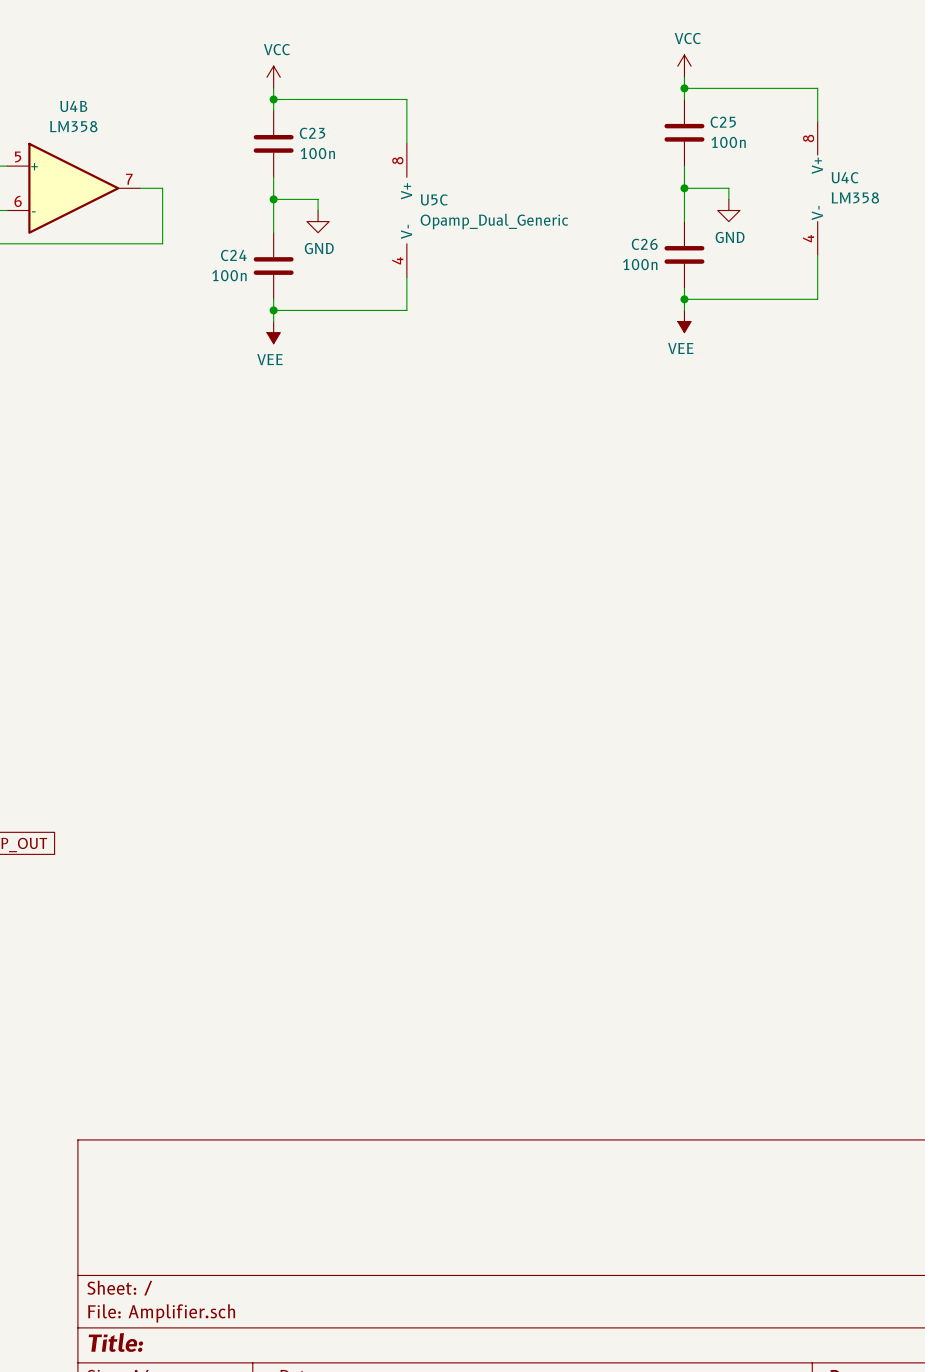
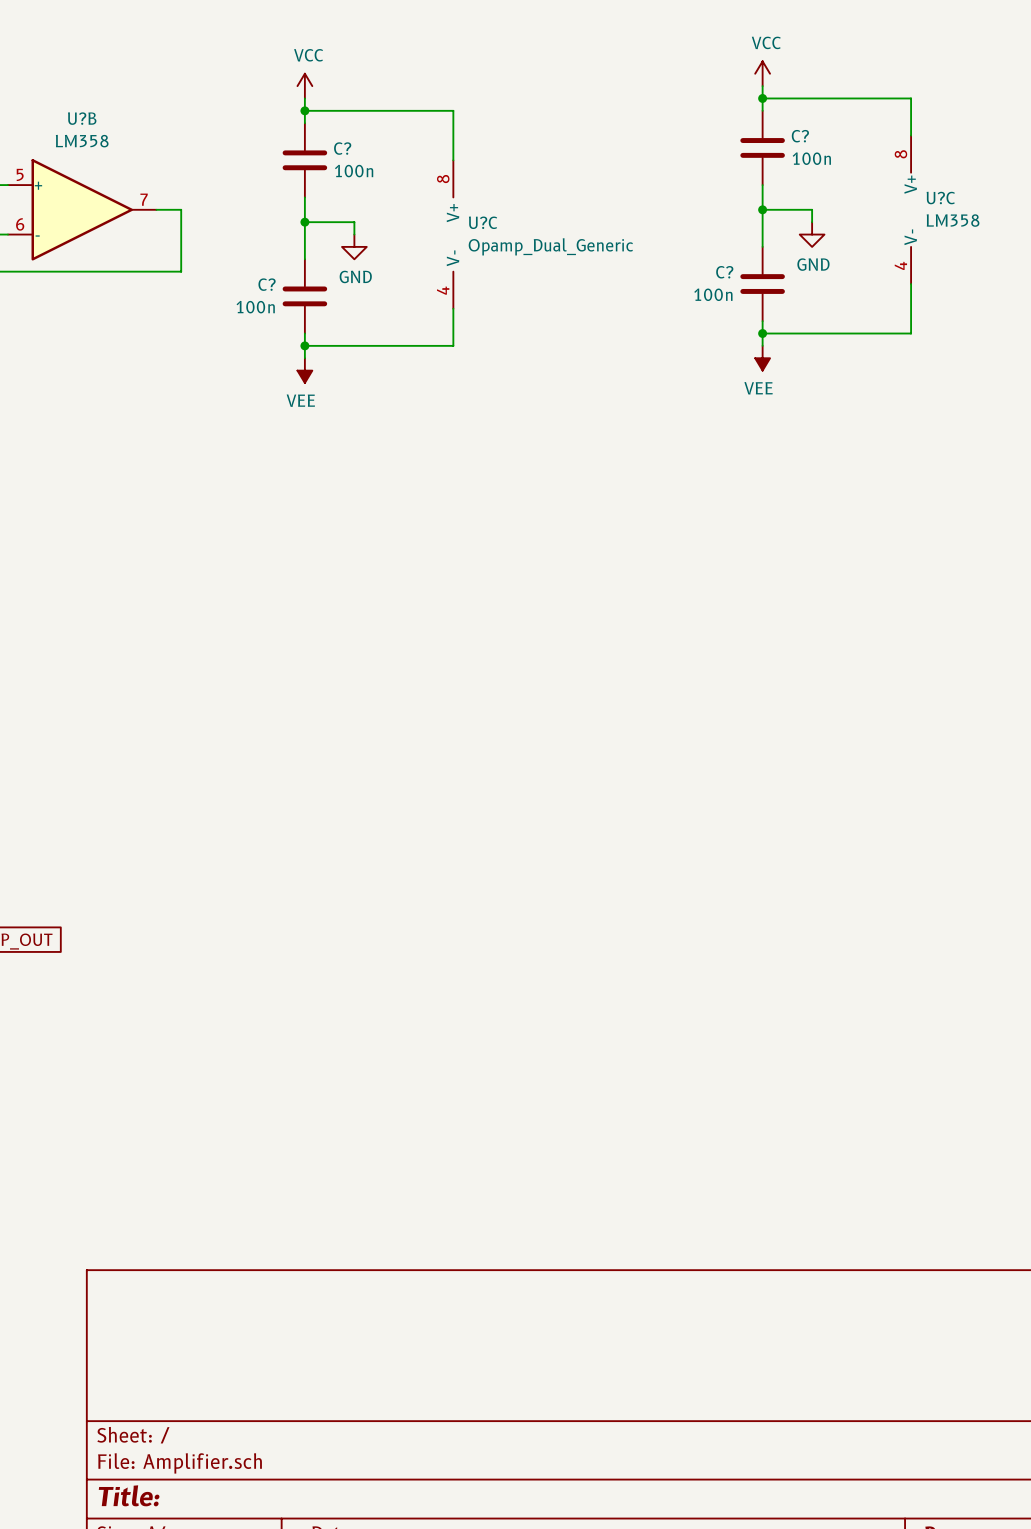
U4B name: U4B (73, 106) -> U?B (82, 118)
C25 name: C25 (723, 122) -> C? (800, 136)
C23 name: C23 (312, 133) -> C? (342, 148)
U4C name: U4C (845, 177) -> U?C (940, 198)
U5C name: U5C (434, 199) -> U?C (483, 222)
C26 name: C26 (644, 244) -> C? (724, 272)
C24 name: C24 (233, 255) -> C? (267, 284)

